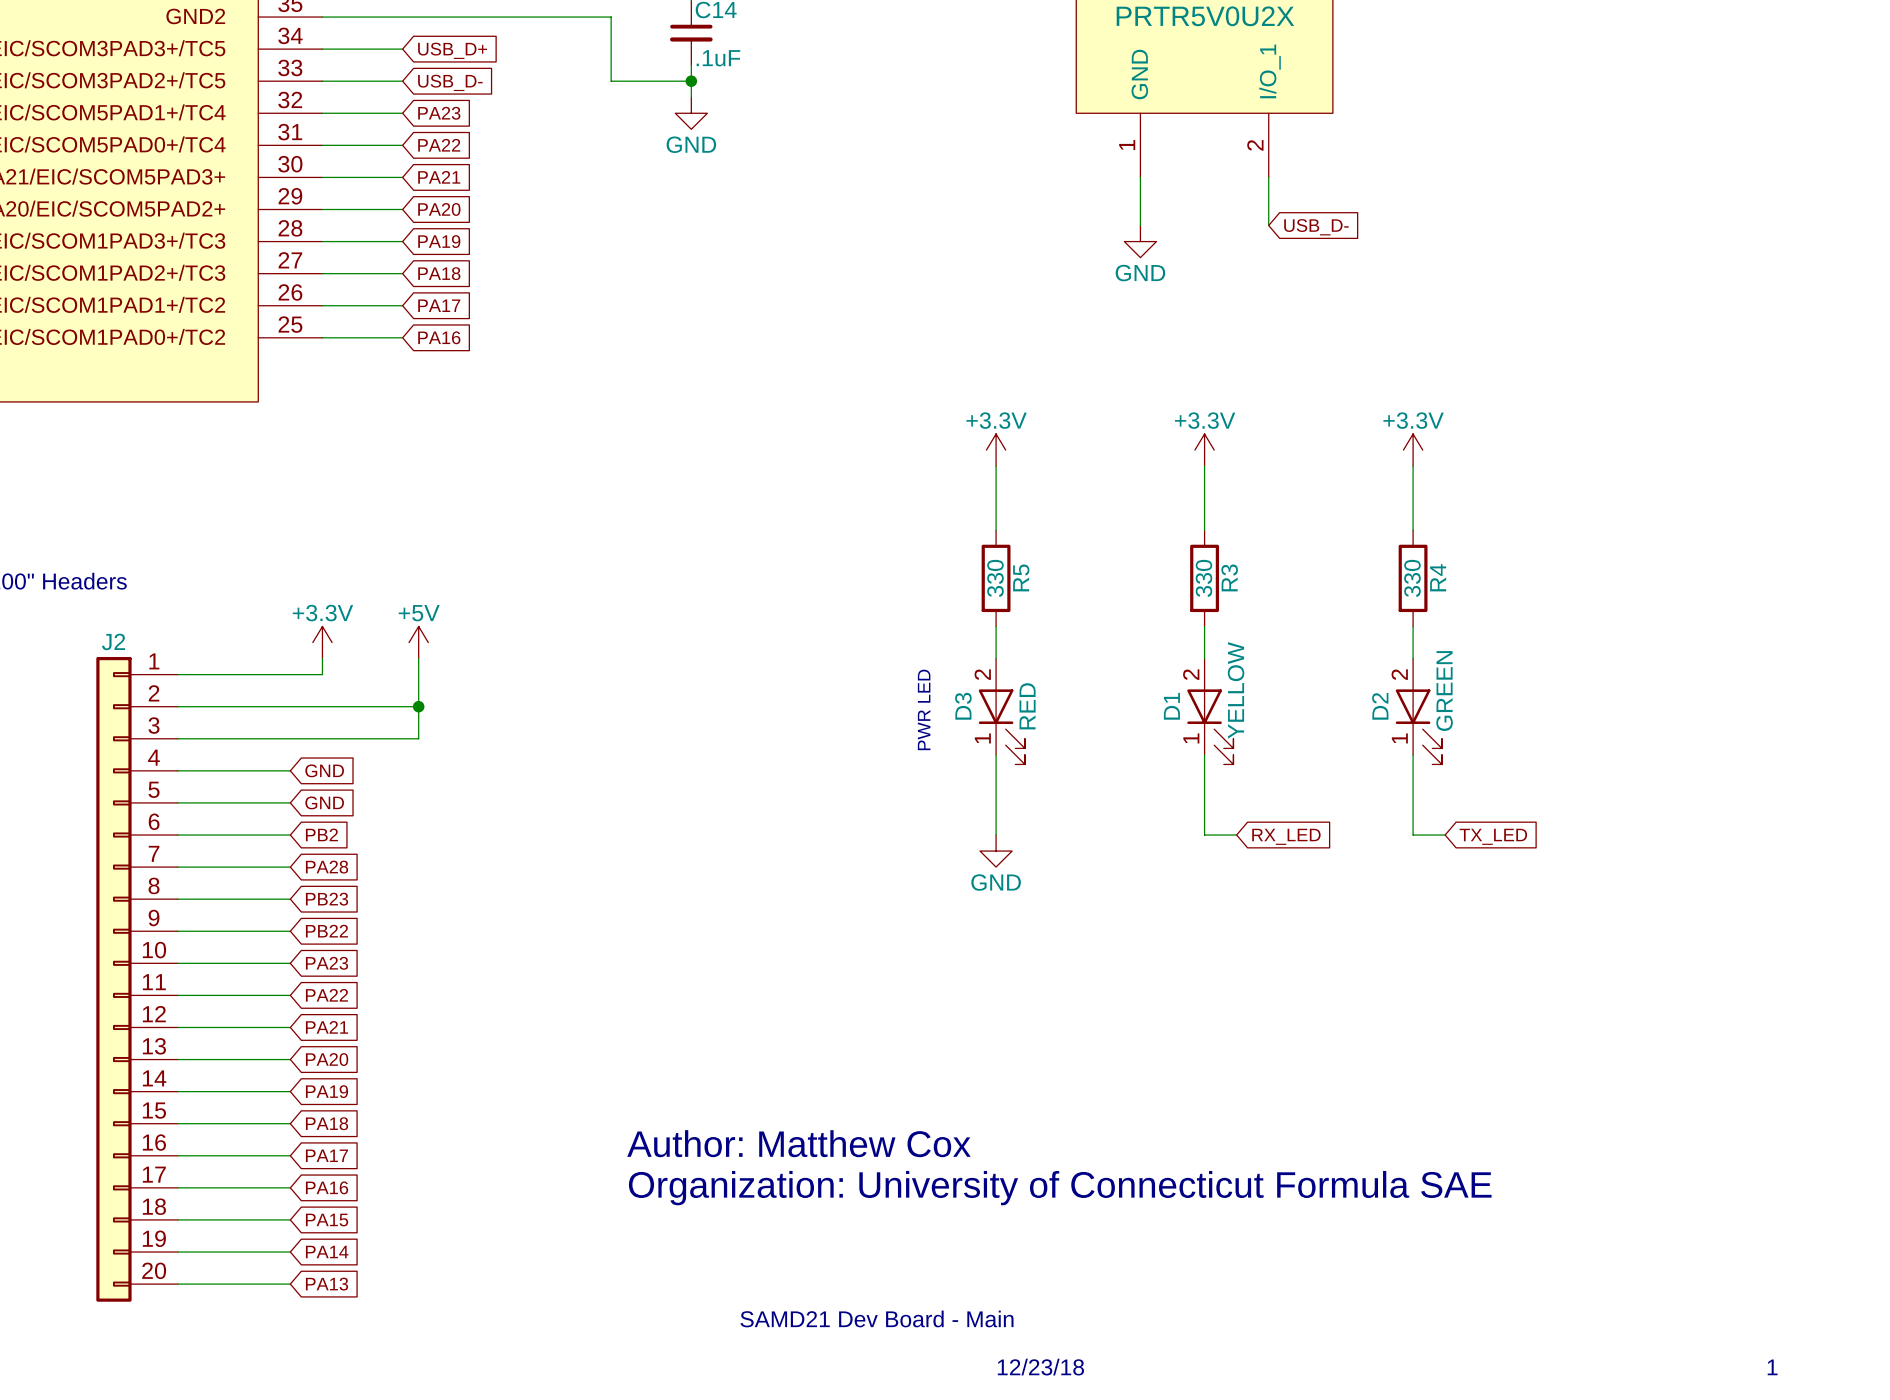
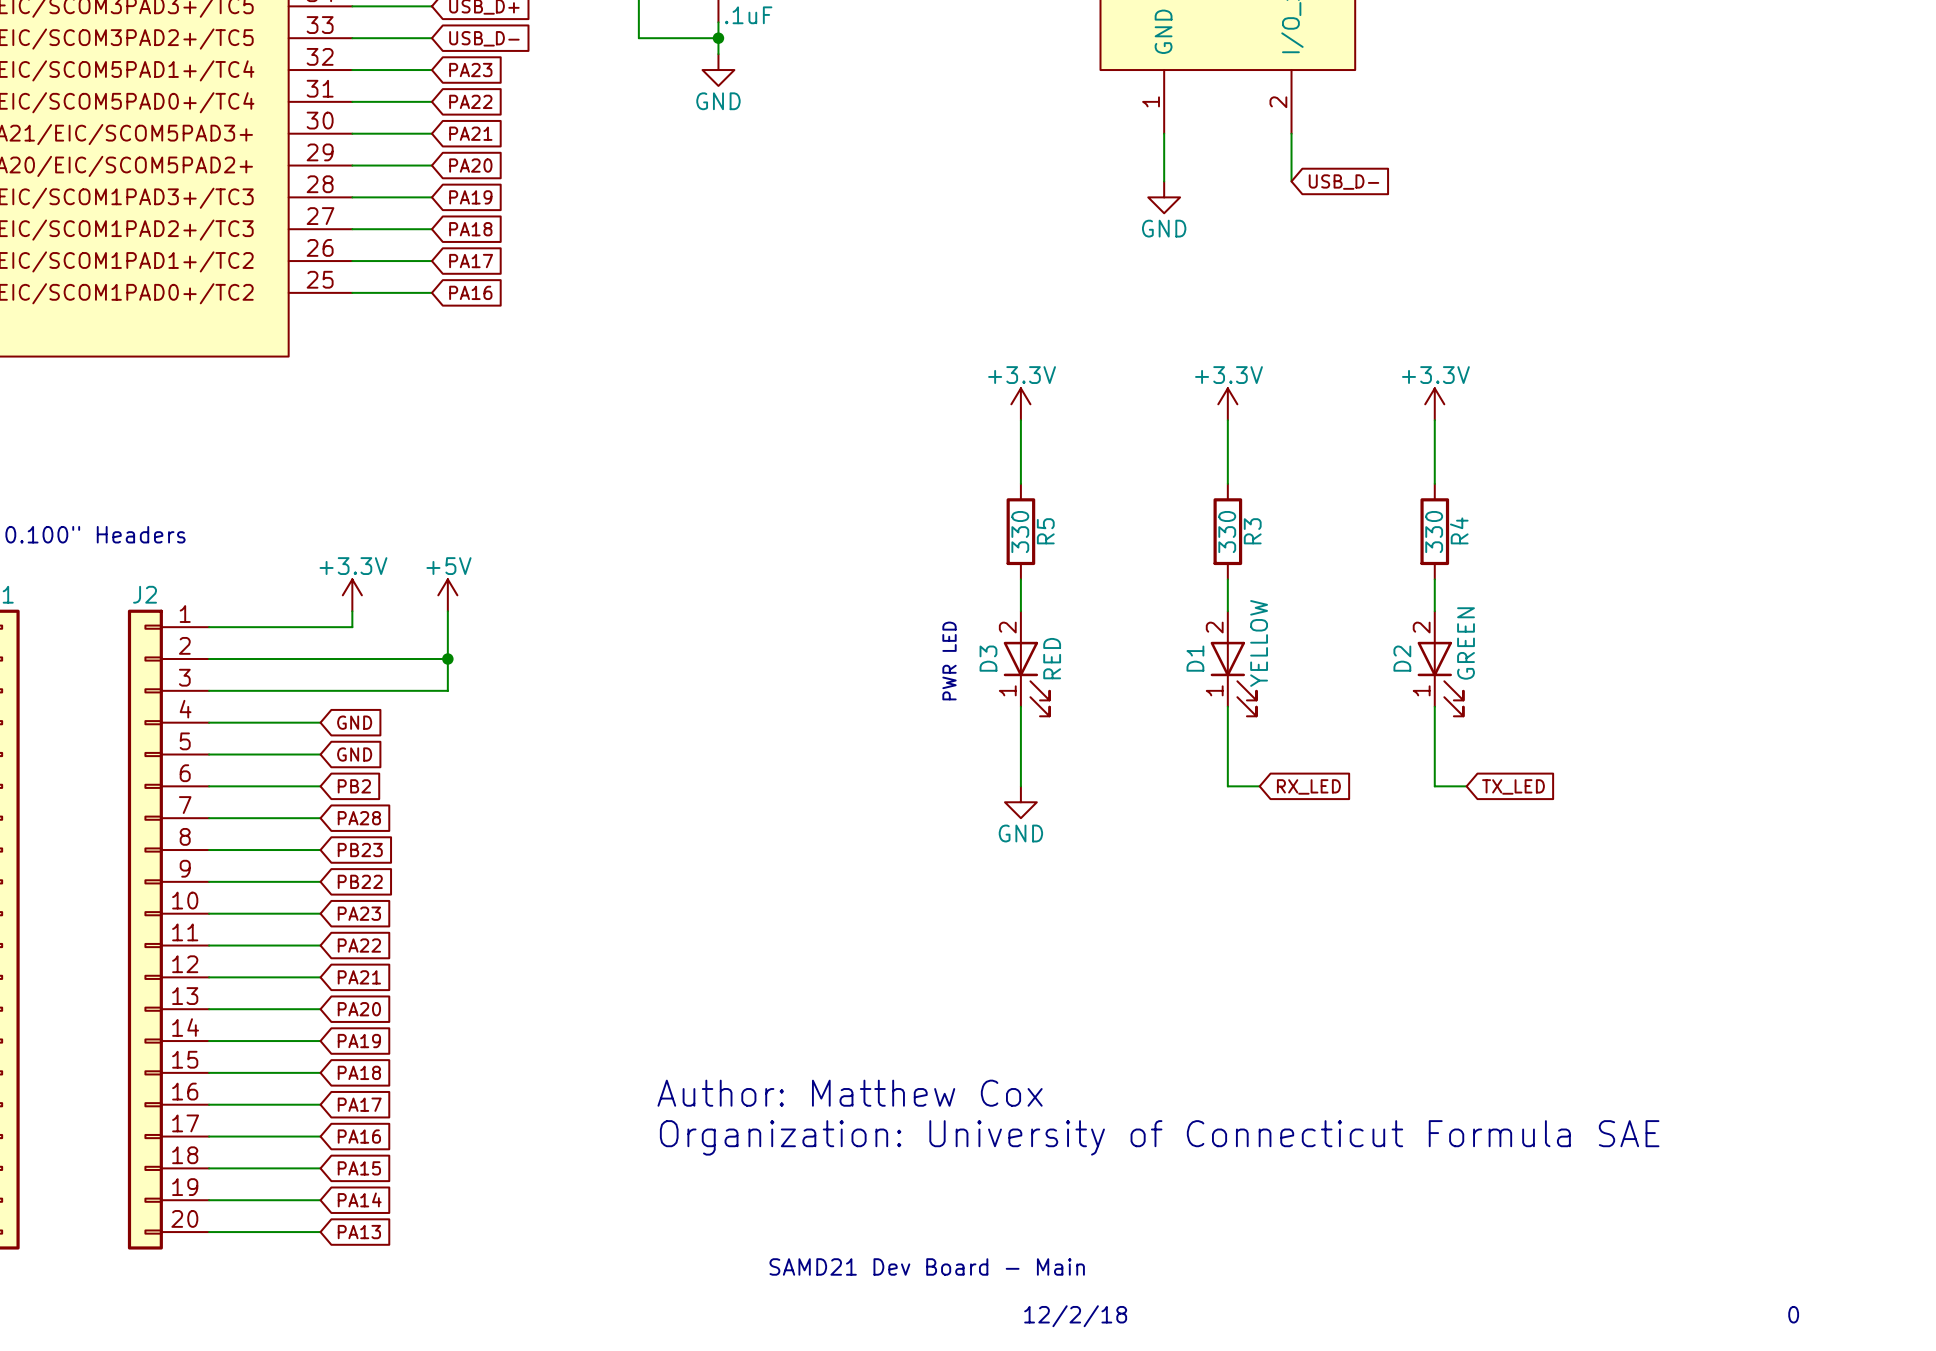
text: 12/23/18 (1040, 1367) -> 12/2/18 (1075, 1316)
text: 1 (1772, 1367) -> 0 (1793, 1314)

